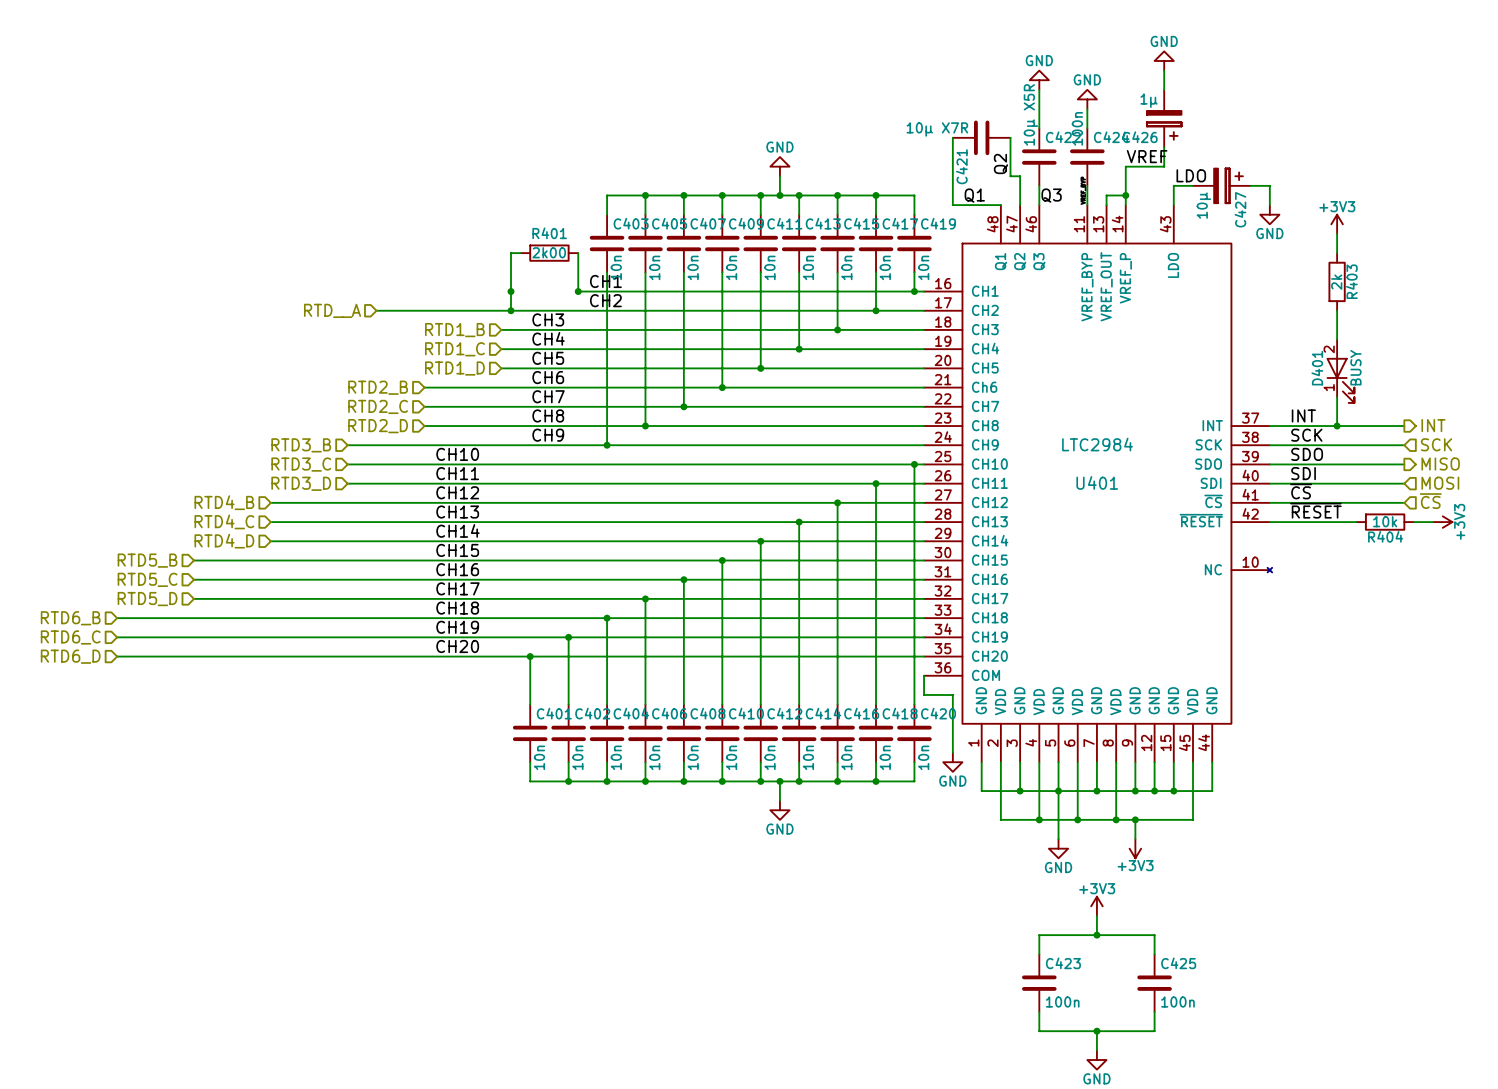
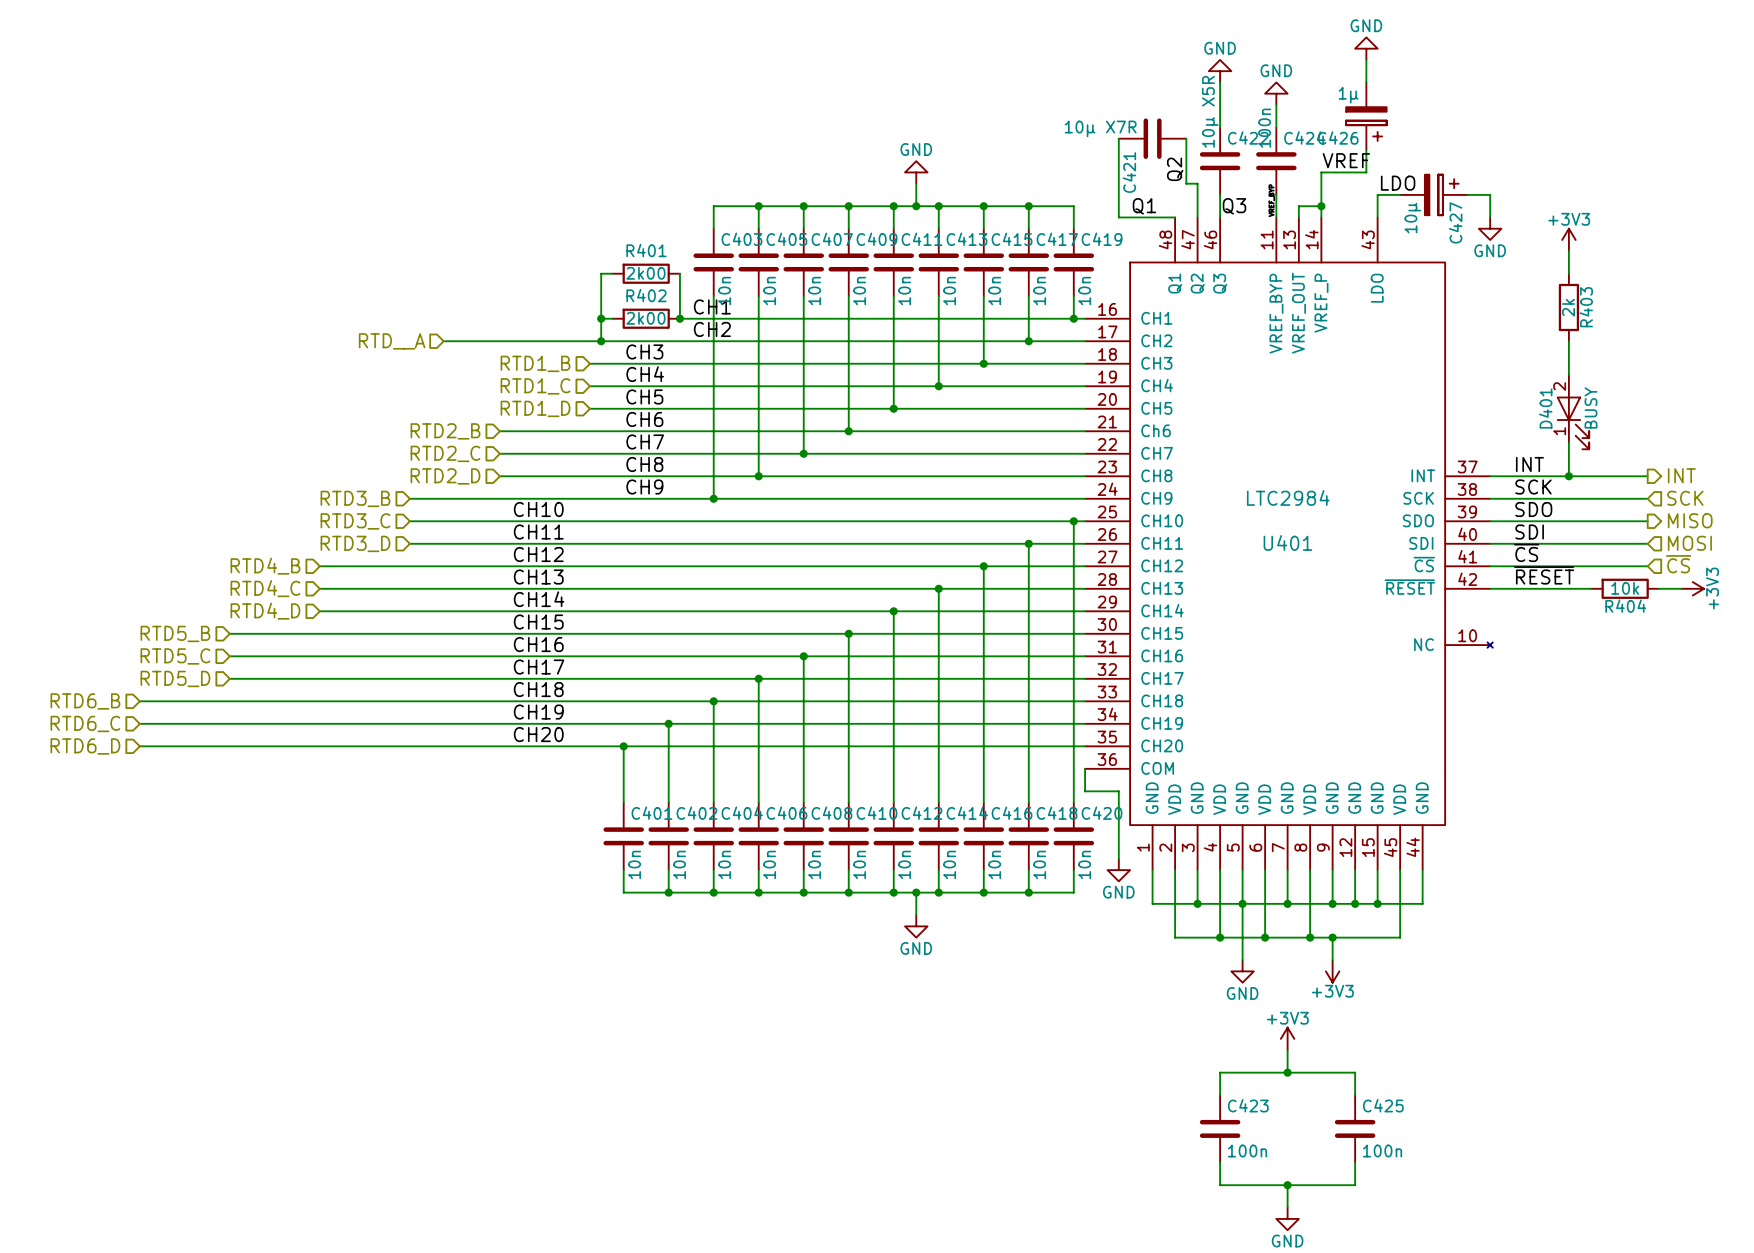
wire: none -> (601, 318) (612, 318)
R402: none -> 2k00 (646, 318)

